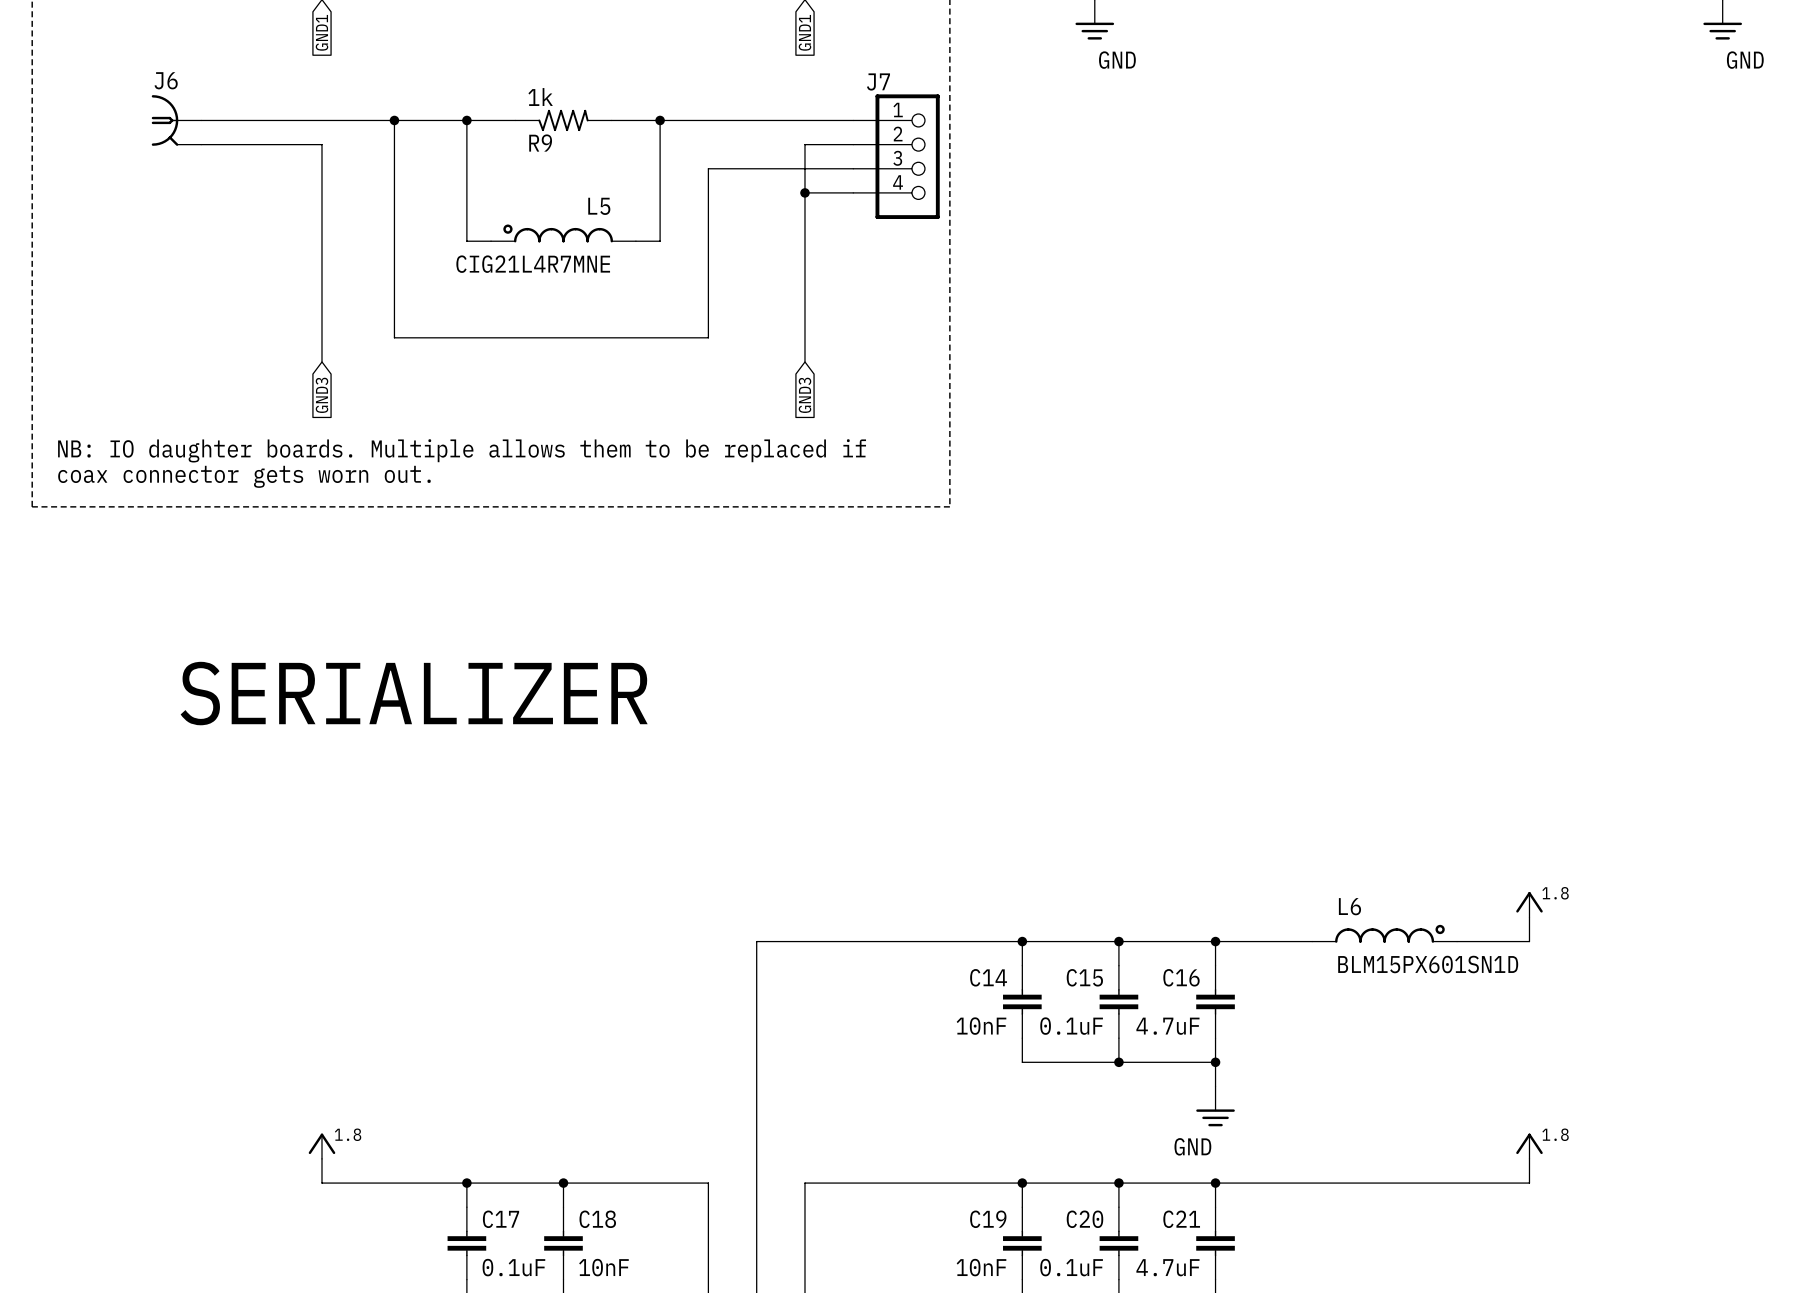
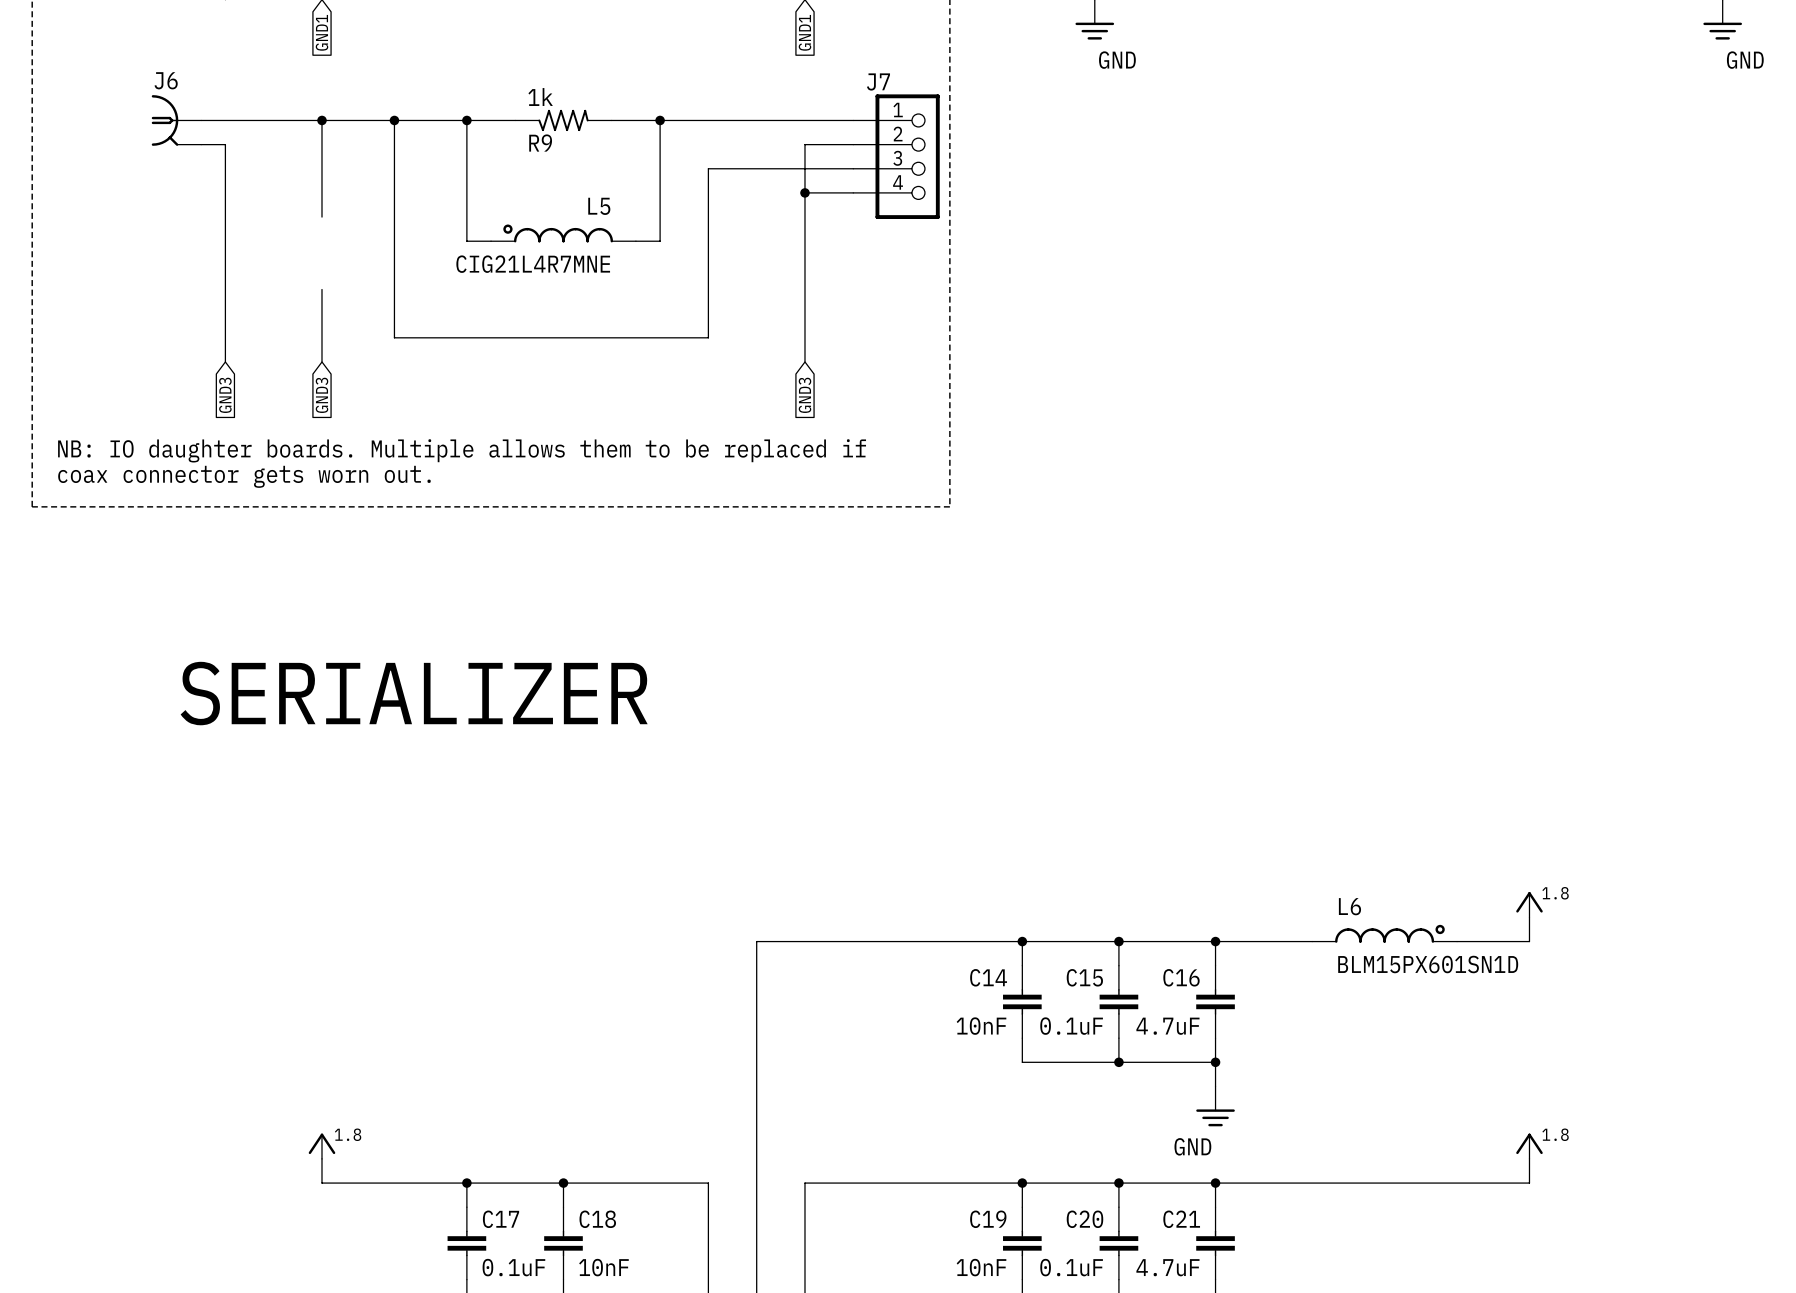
junction: none -> (321, 120)
wire: (225, 144) (321, 144) -> (321, 120) (321, 144)
wire: none -> (225, 144) (225, 361)
wire: (321, 217) (321, 289) -> none
global label: none -> GND3 (225, 395)

